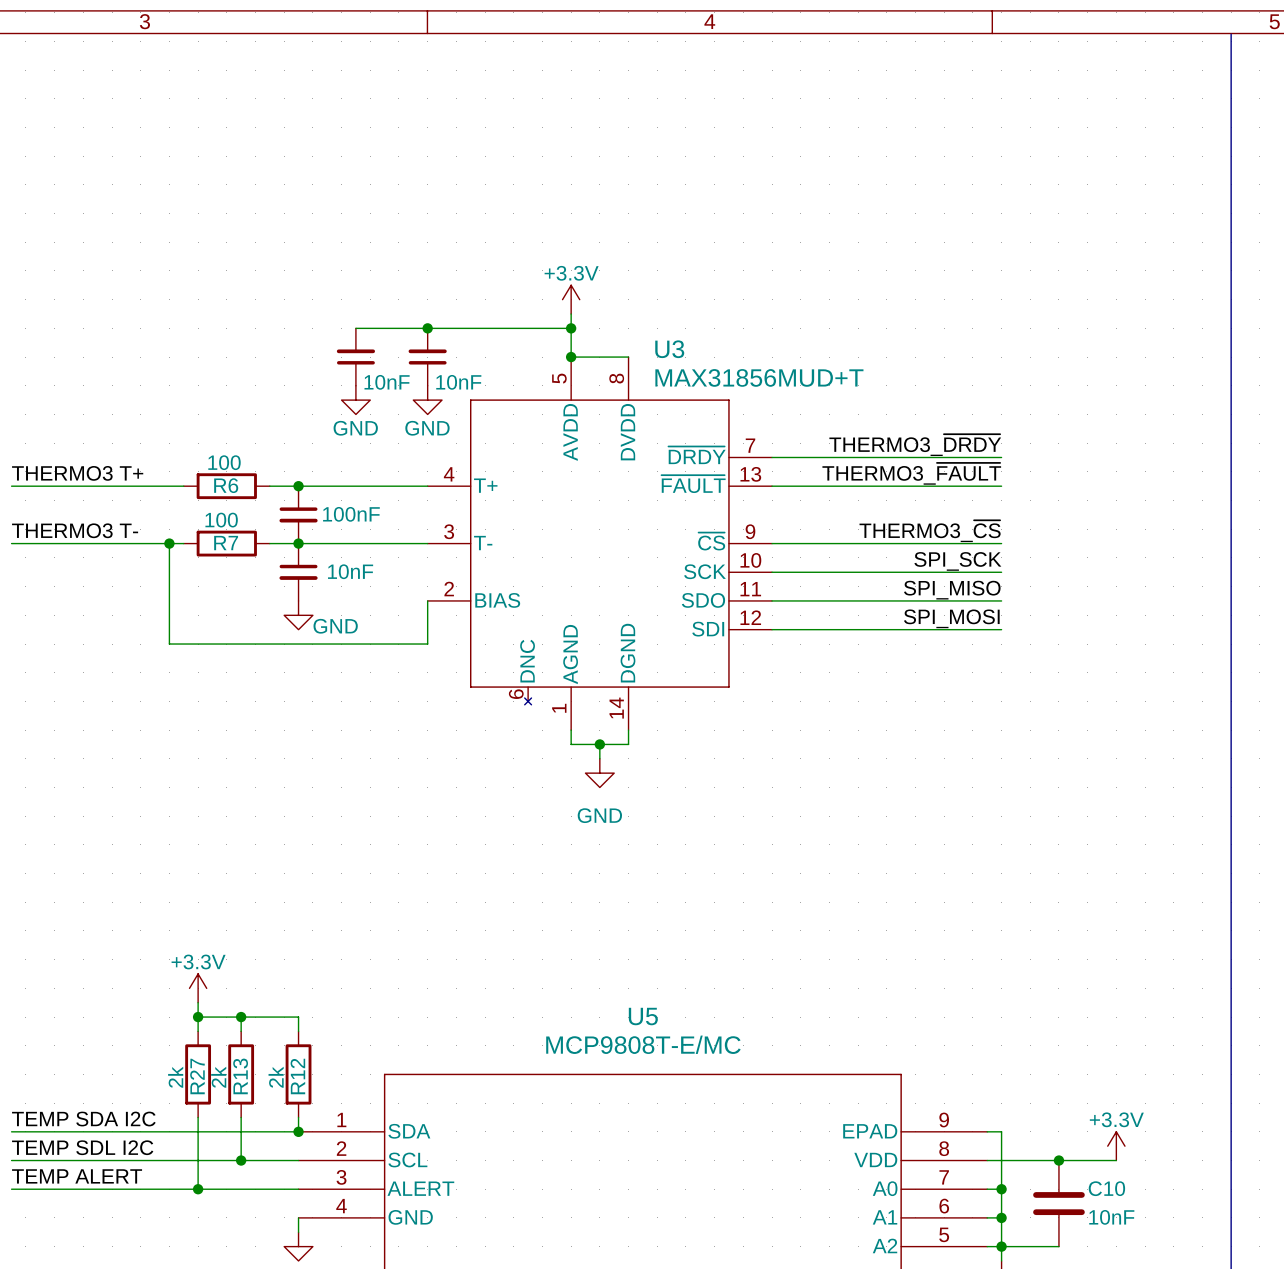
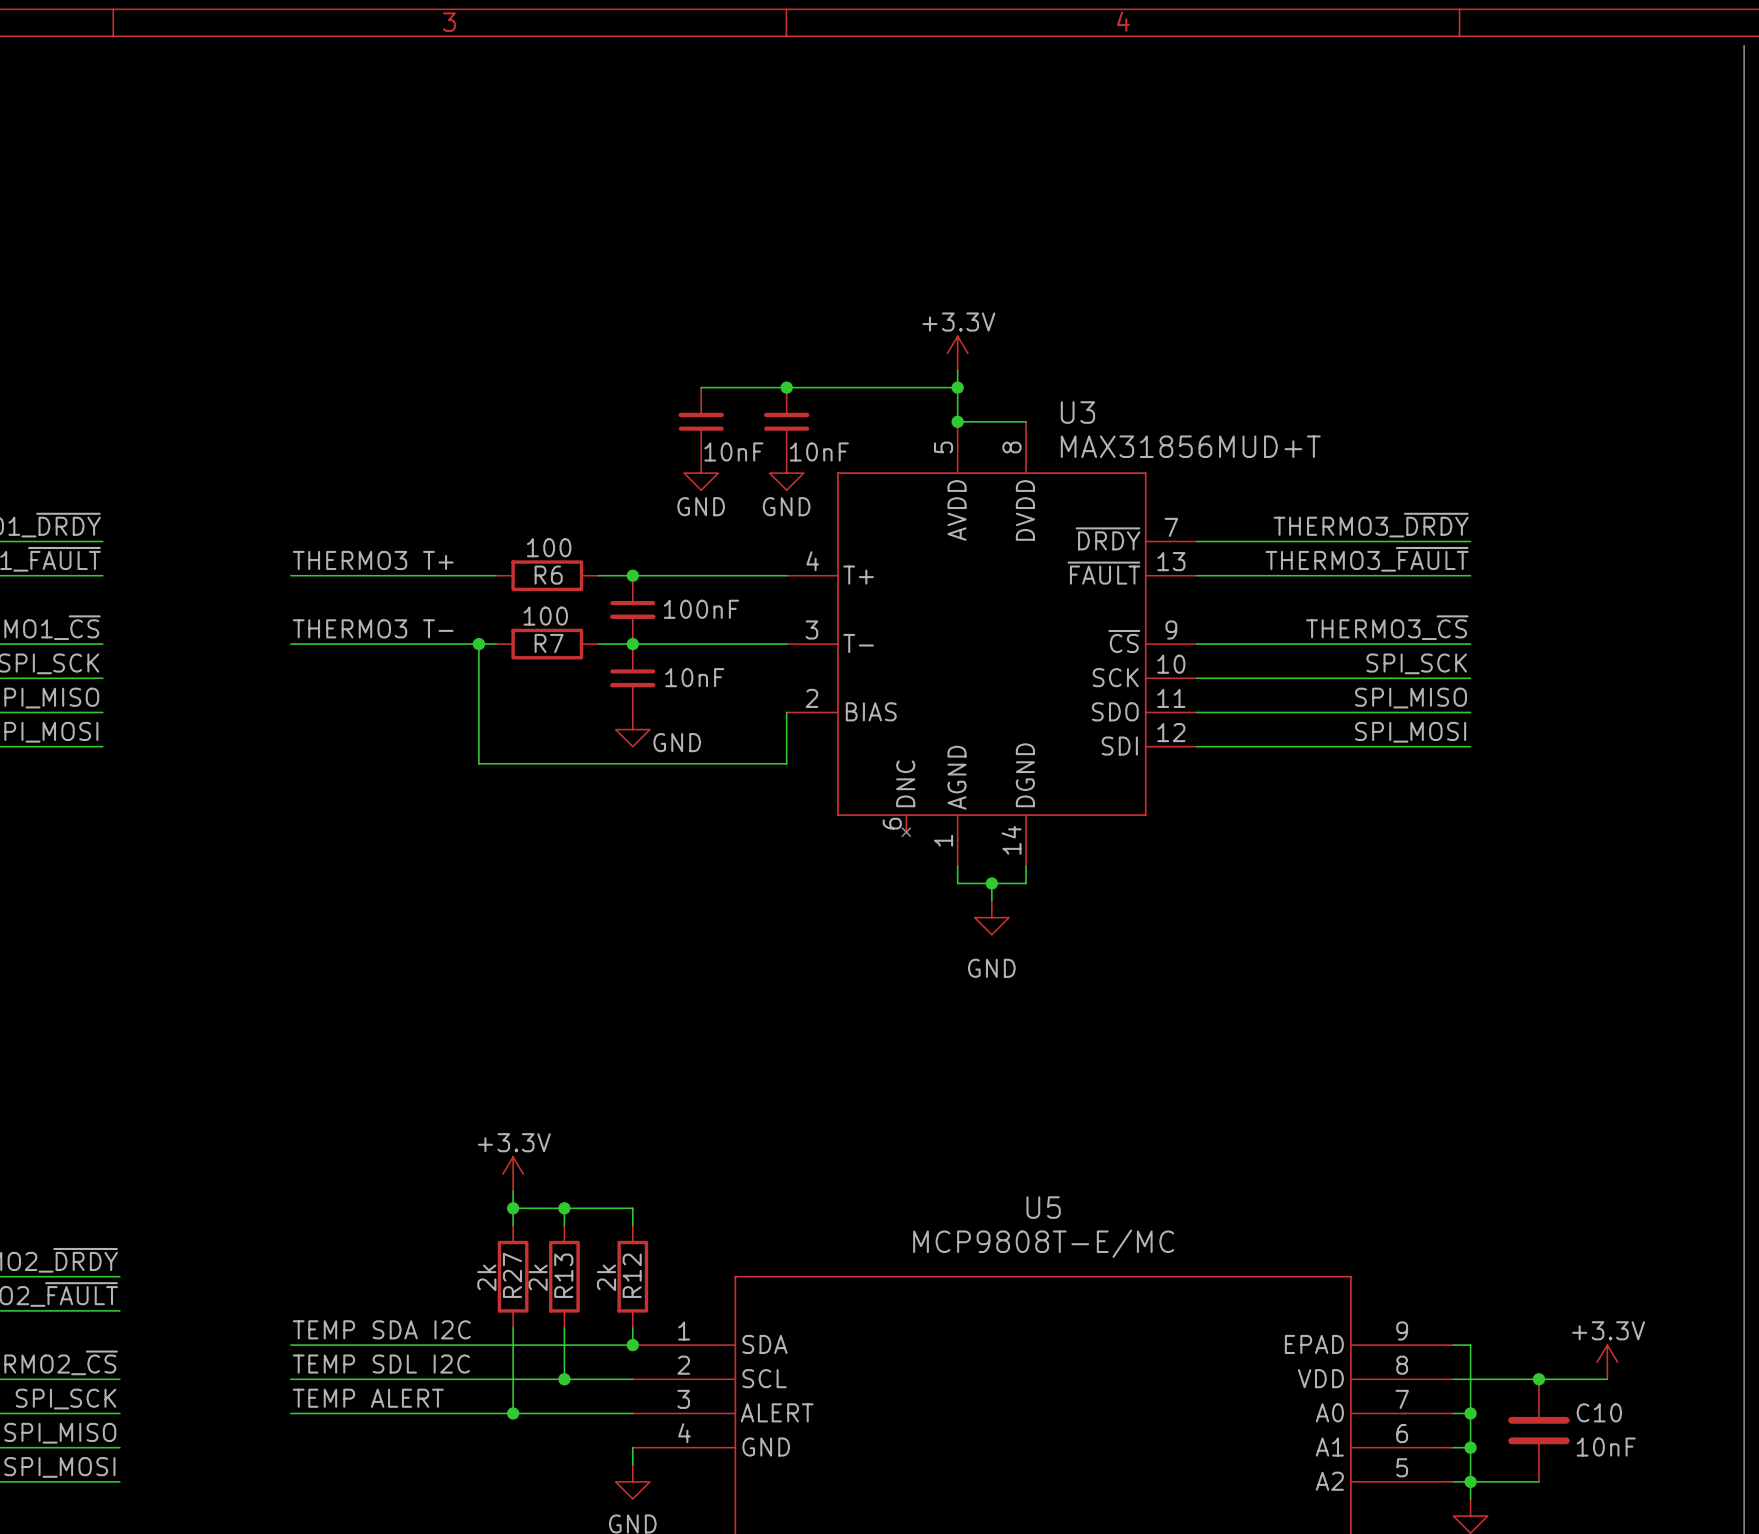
line: (1231, 34) (1231, 41) -> none

